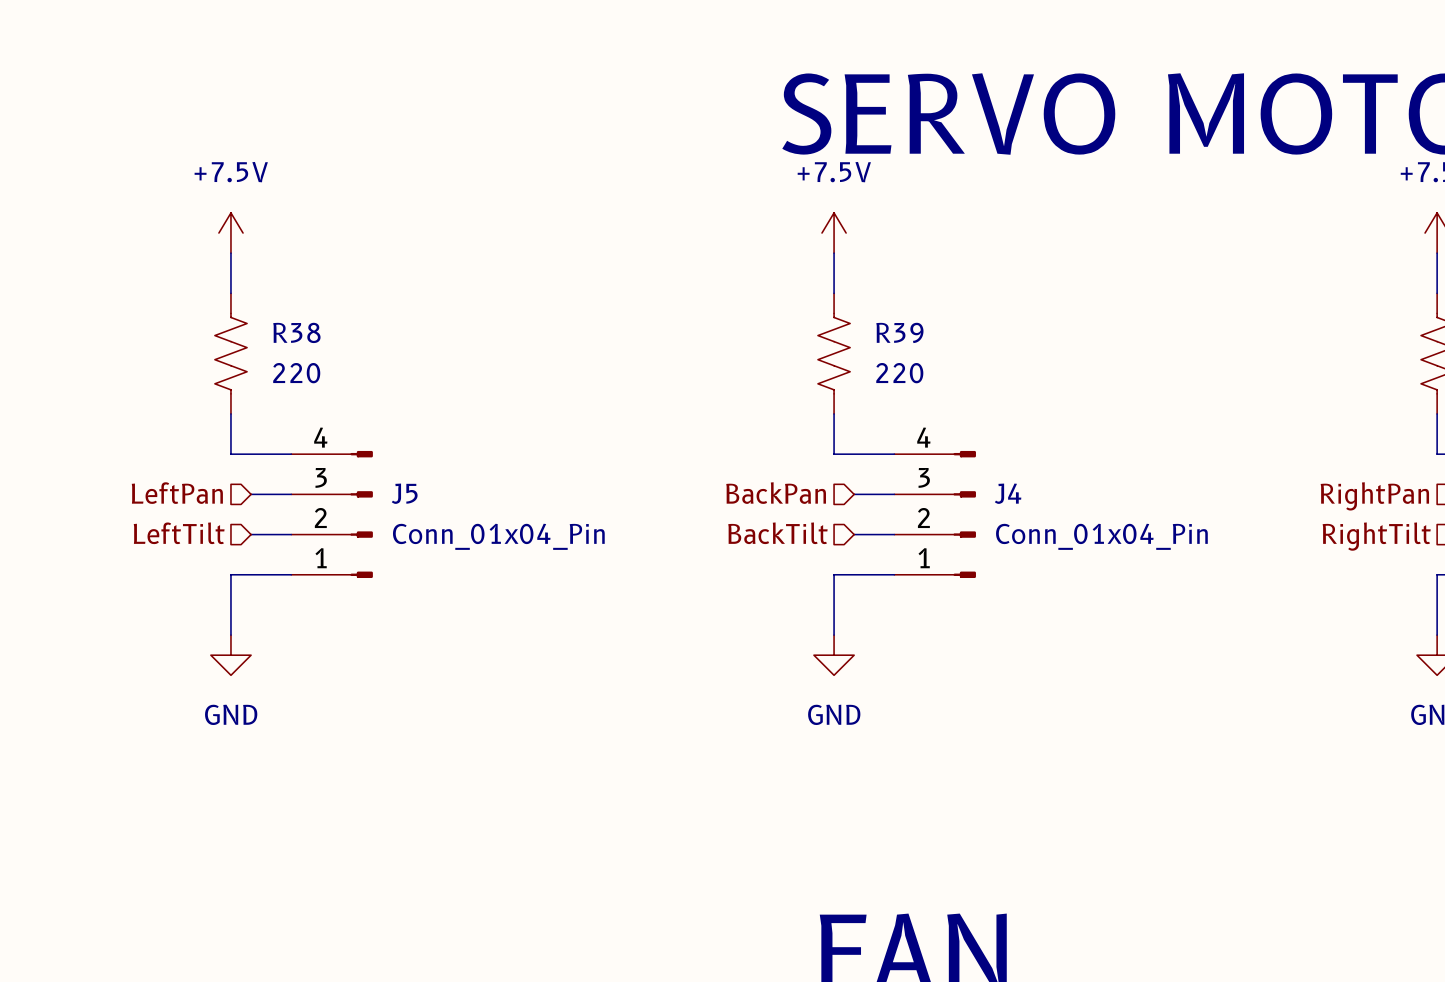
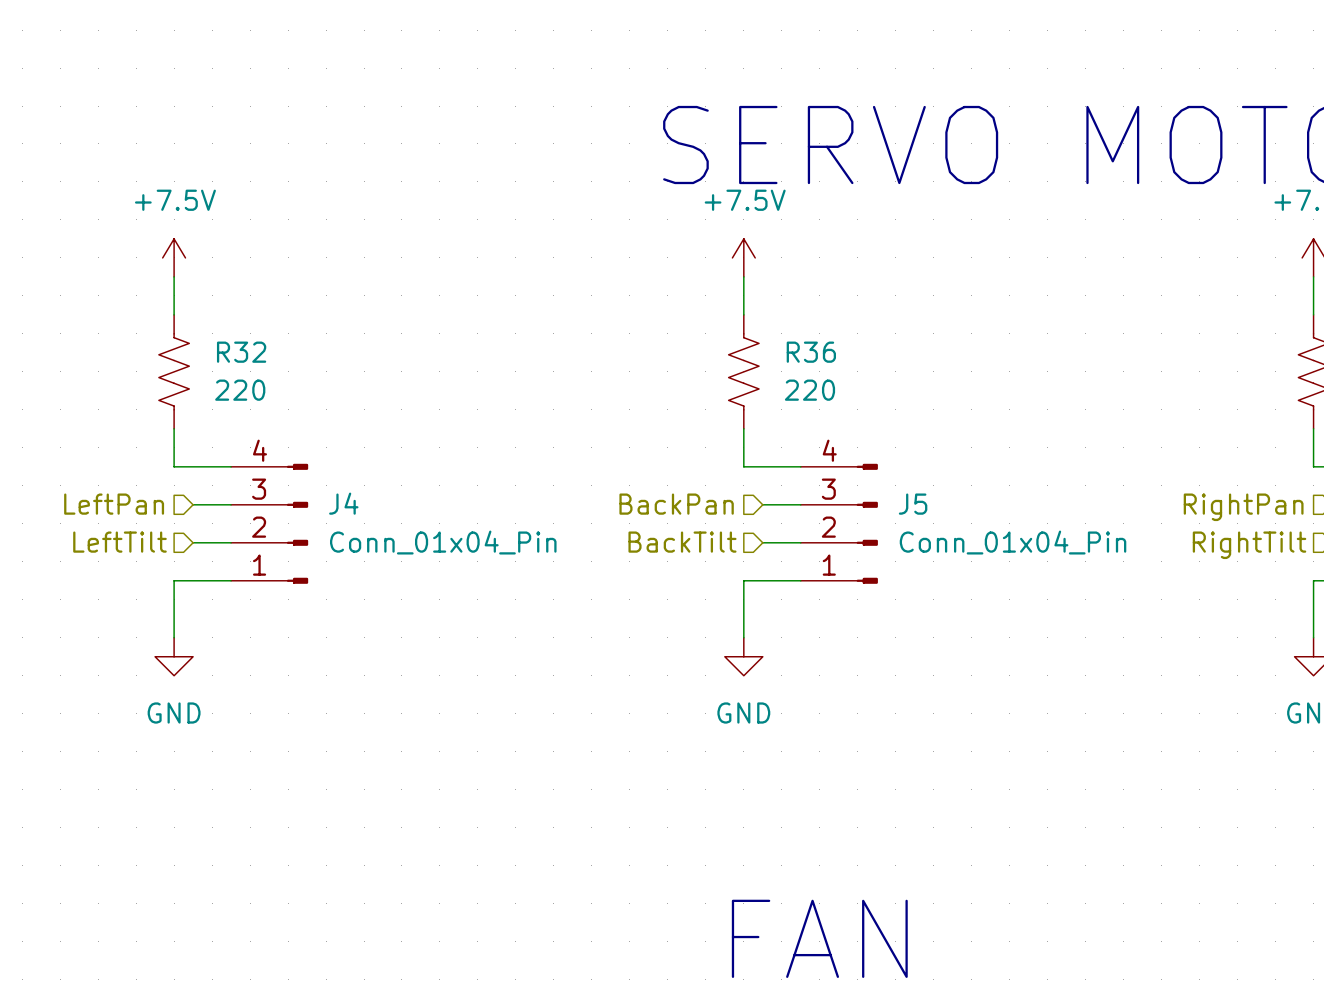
R38 name: R38 (296, 332) -> R32 (241, 352)
R39 name: R39 (899, 332) -> R36 (811, 352)
J5 name: J5 (404, 493) -> J4 (343, 503)
J4 name: J4 (1008, 493) -> J5 (913, 504)

